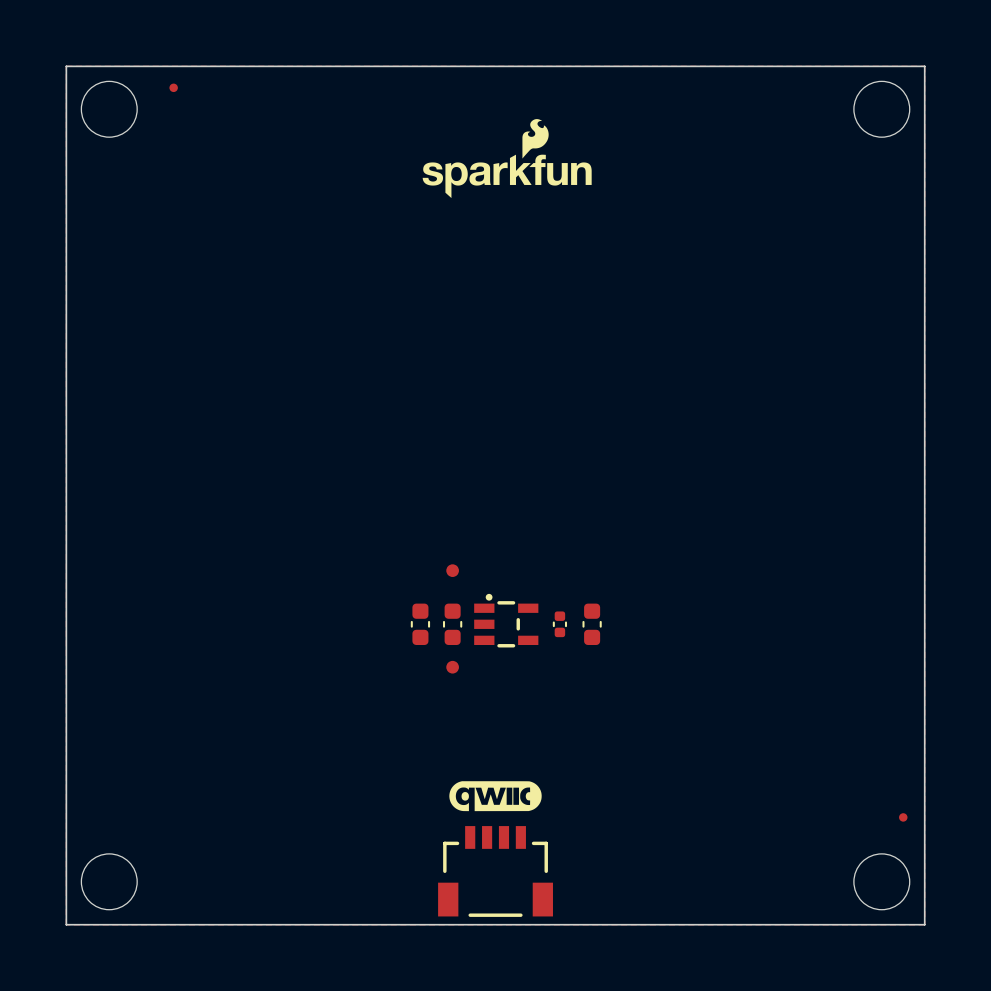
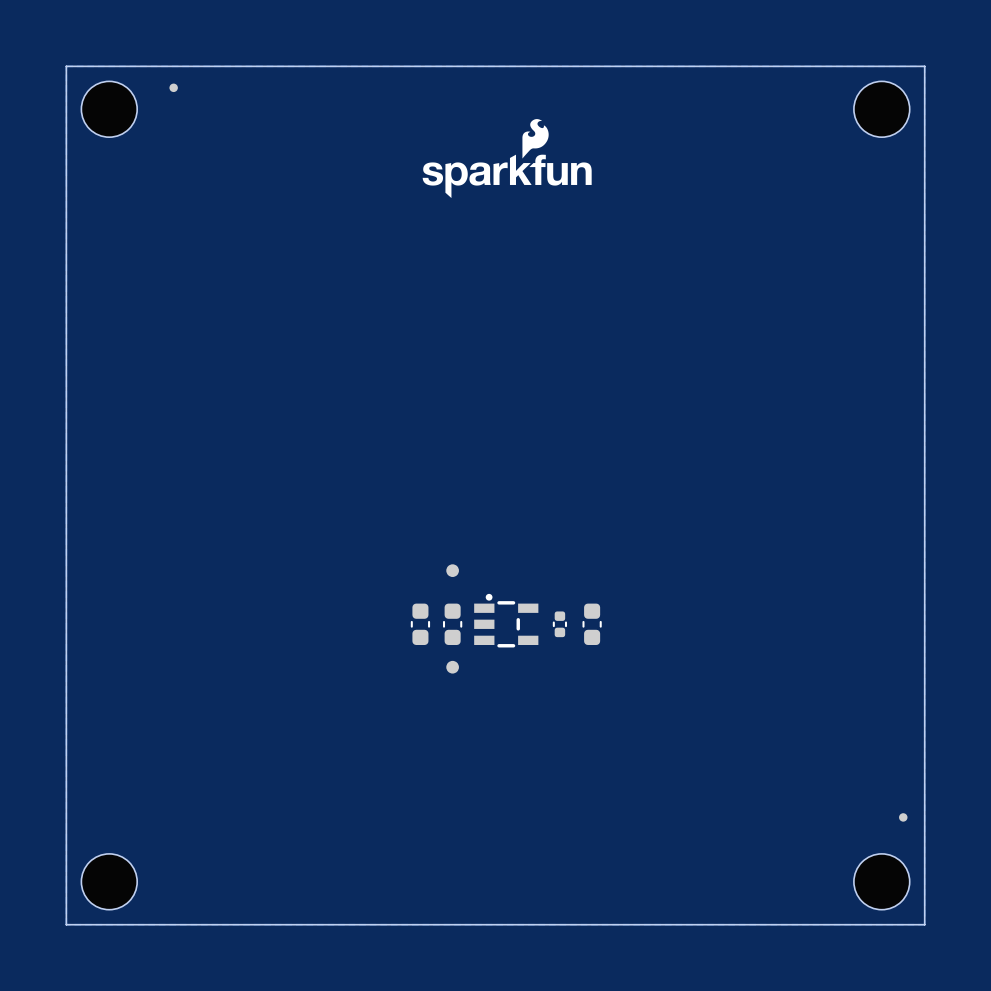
drawing: [449, 781, 542, 812] -> none
part: (495, 871) -> none

